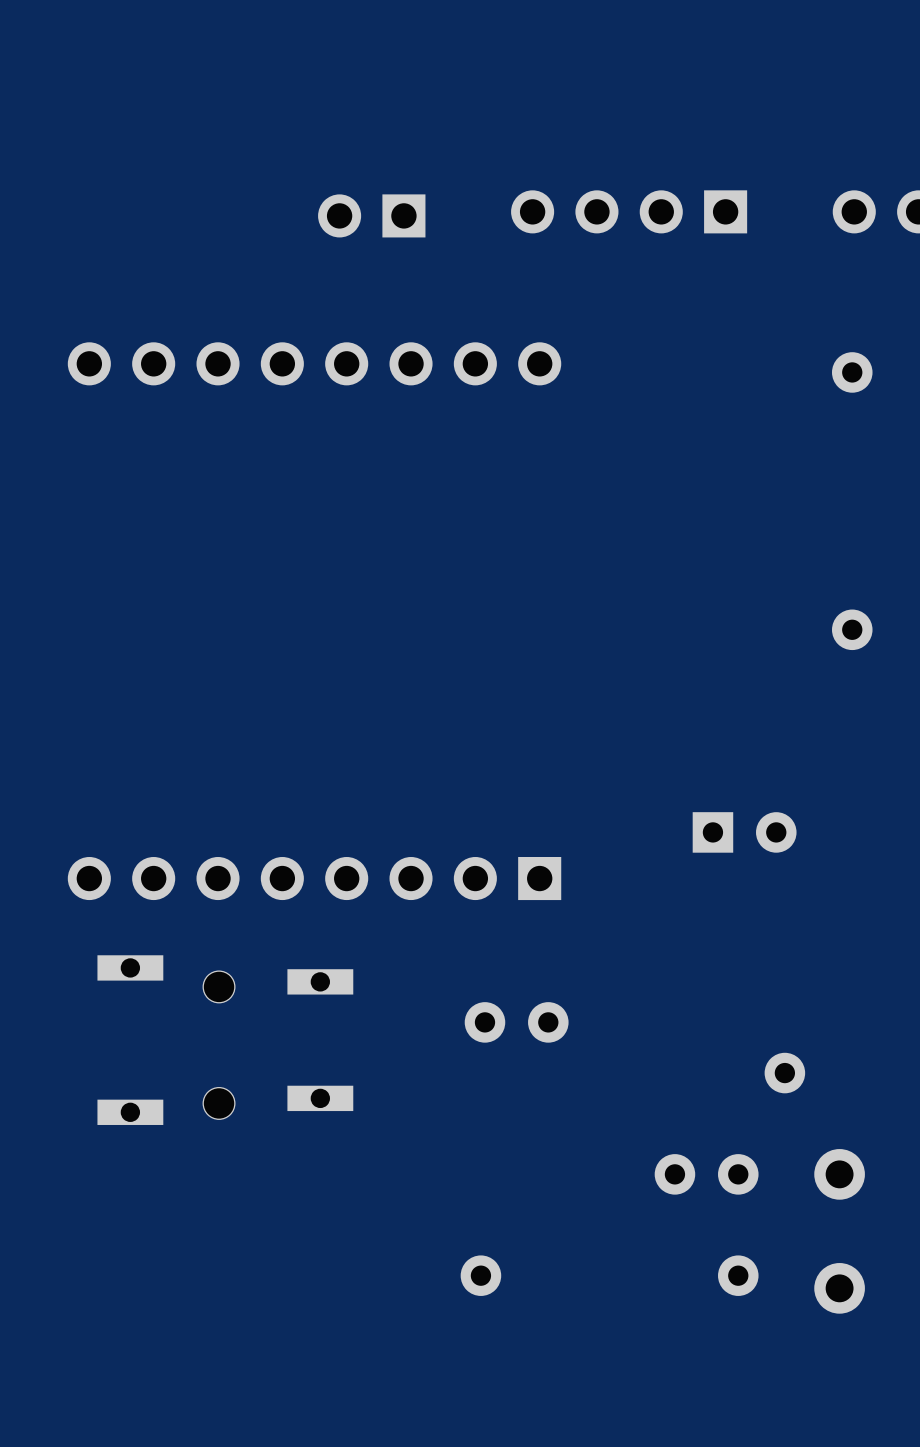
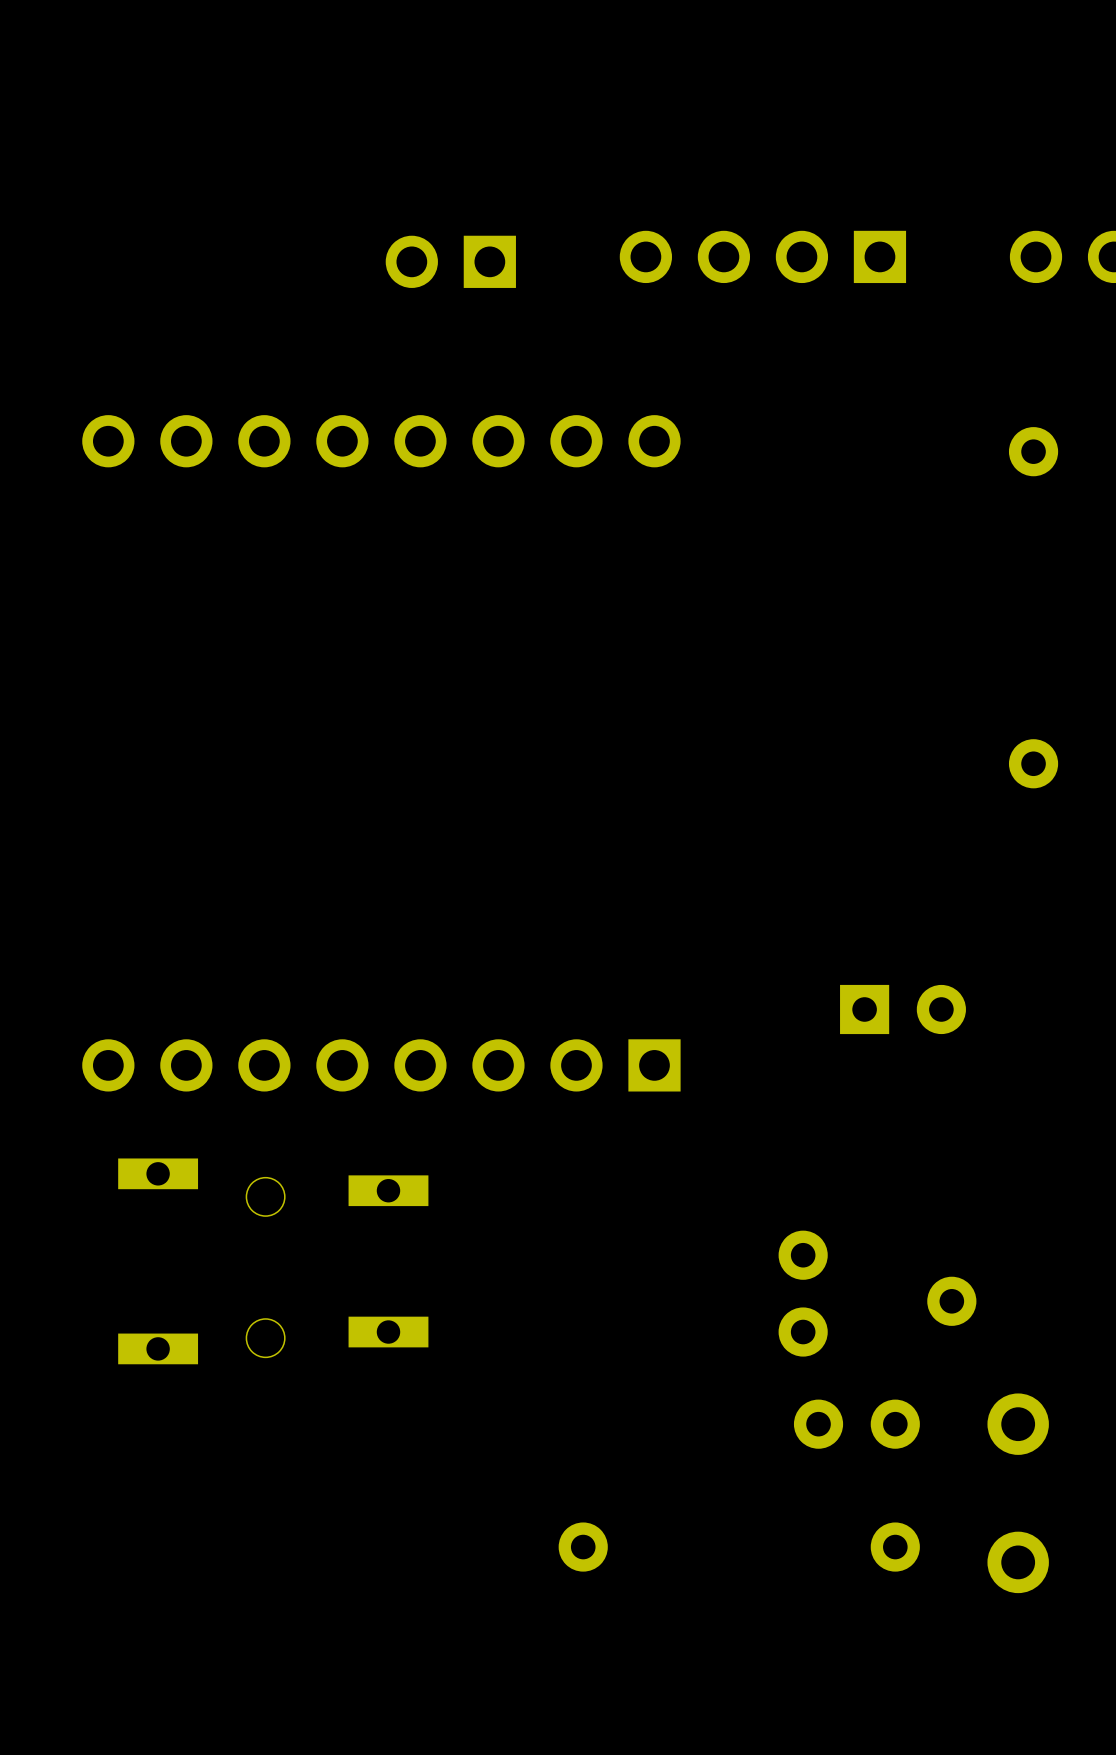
part rotation: 0° (516, 1022) -> 90° clockwise (803, 1293)
part position: (516, 1022) -> (803, 1293)

